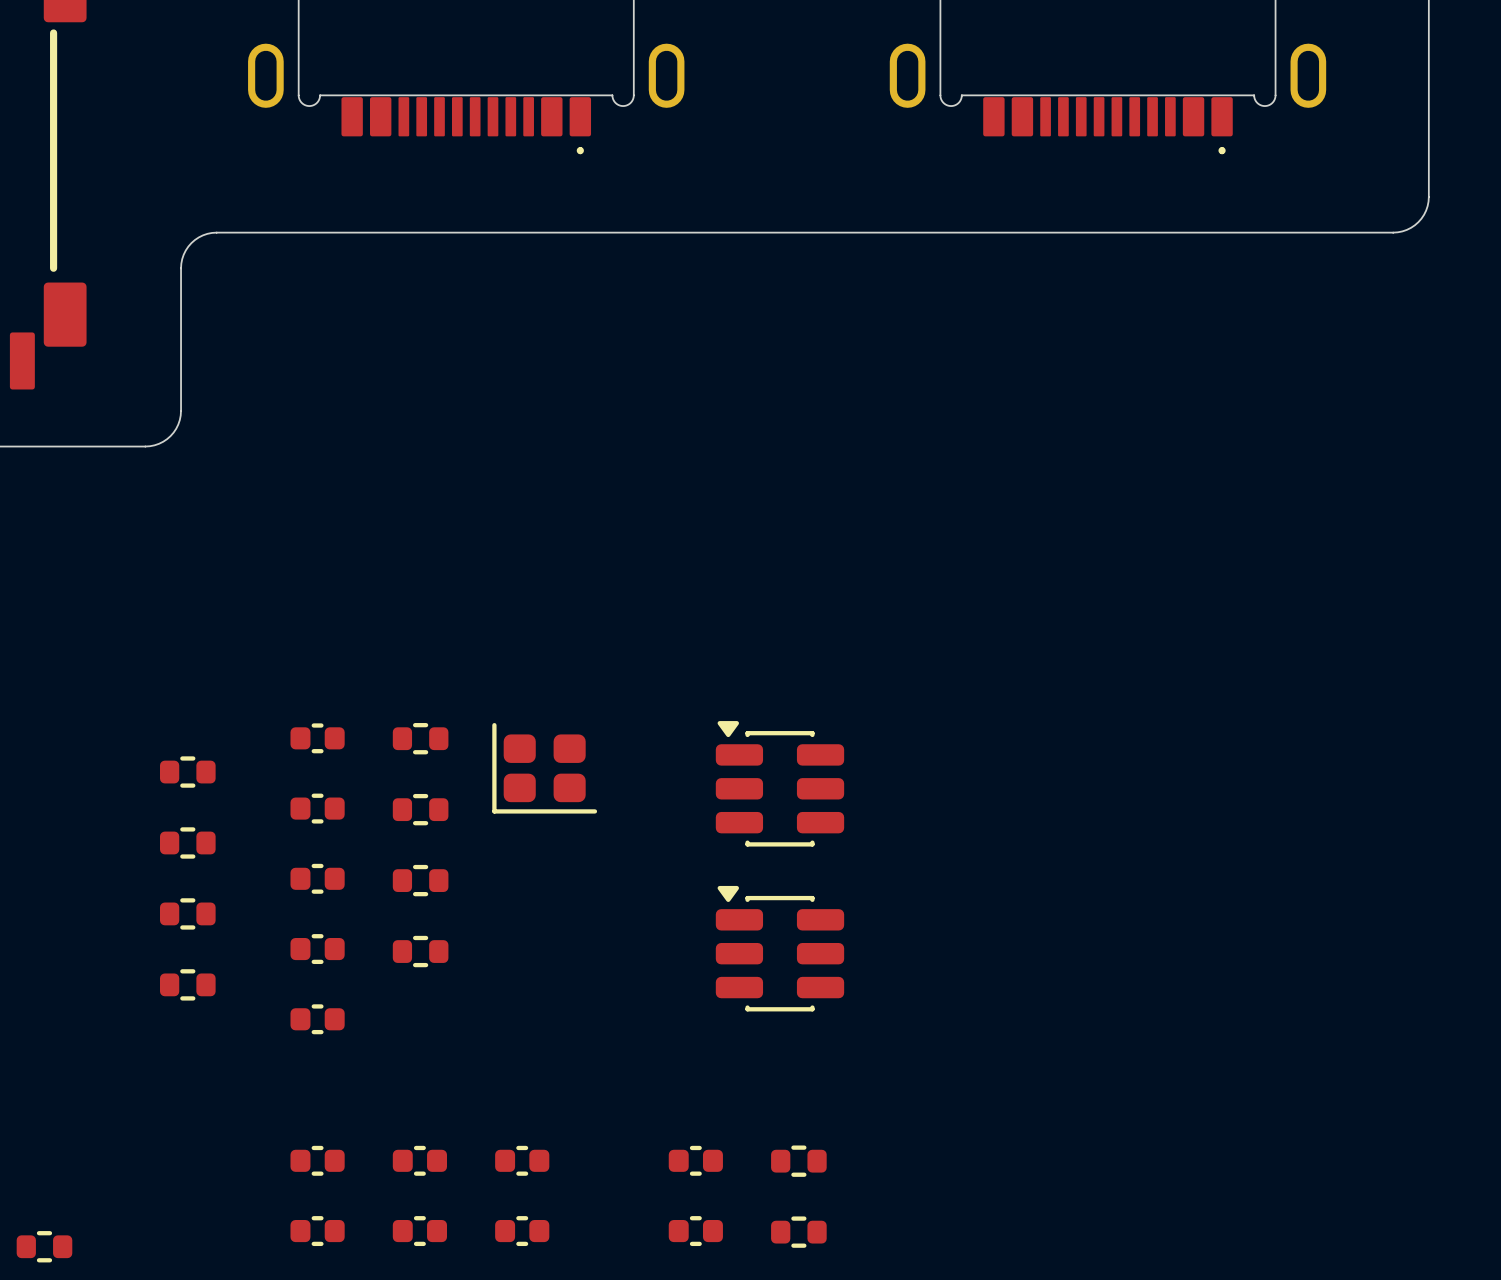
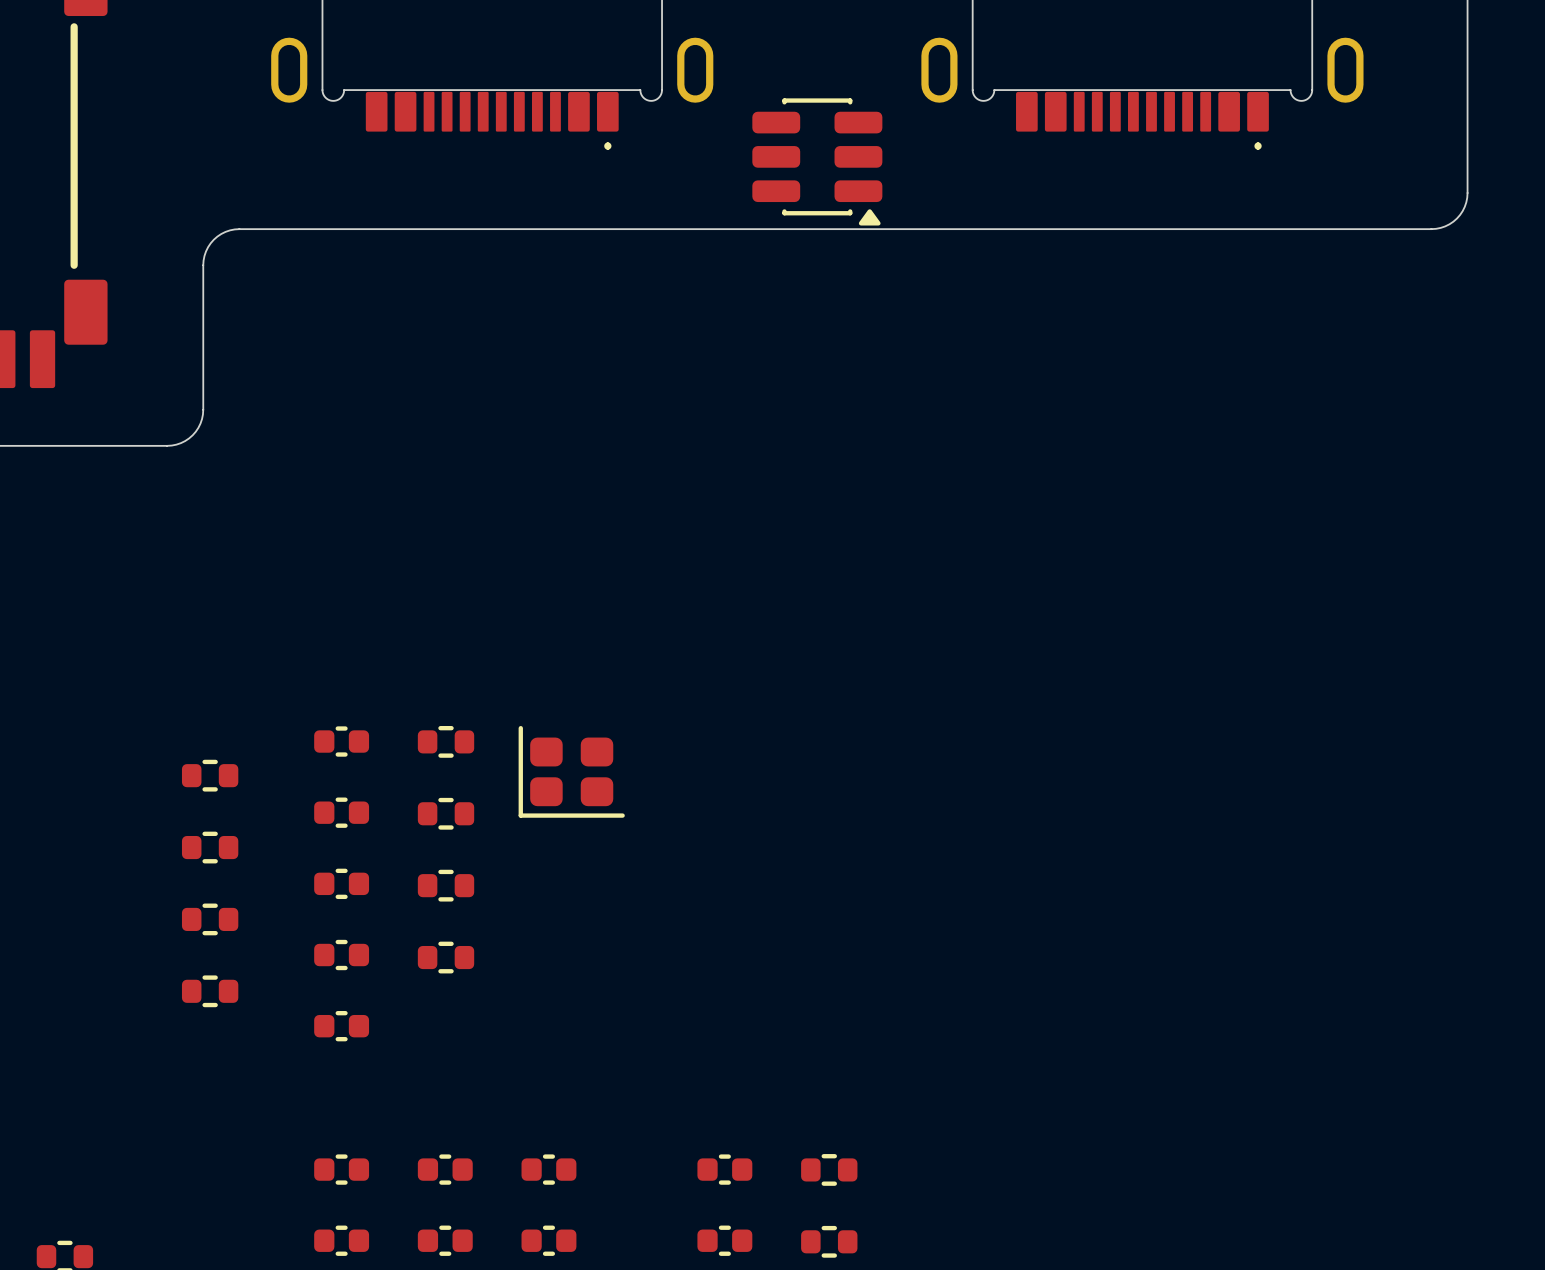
part: none -> (817, 161)
part: (779, 783) -> none
part: (779, 948) -> none

